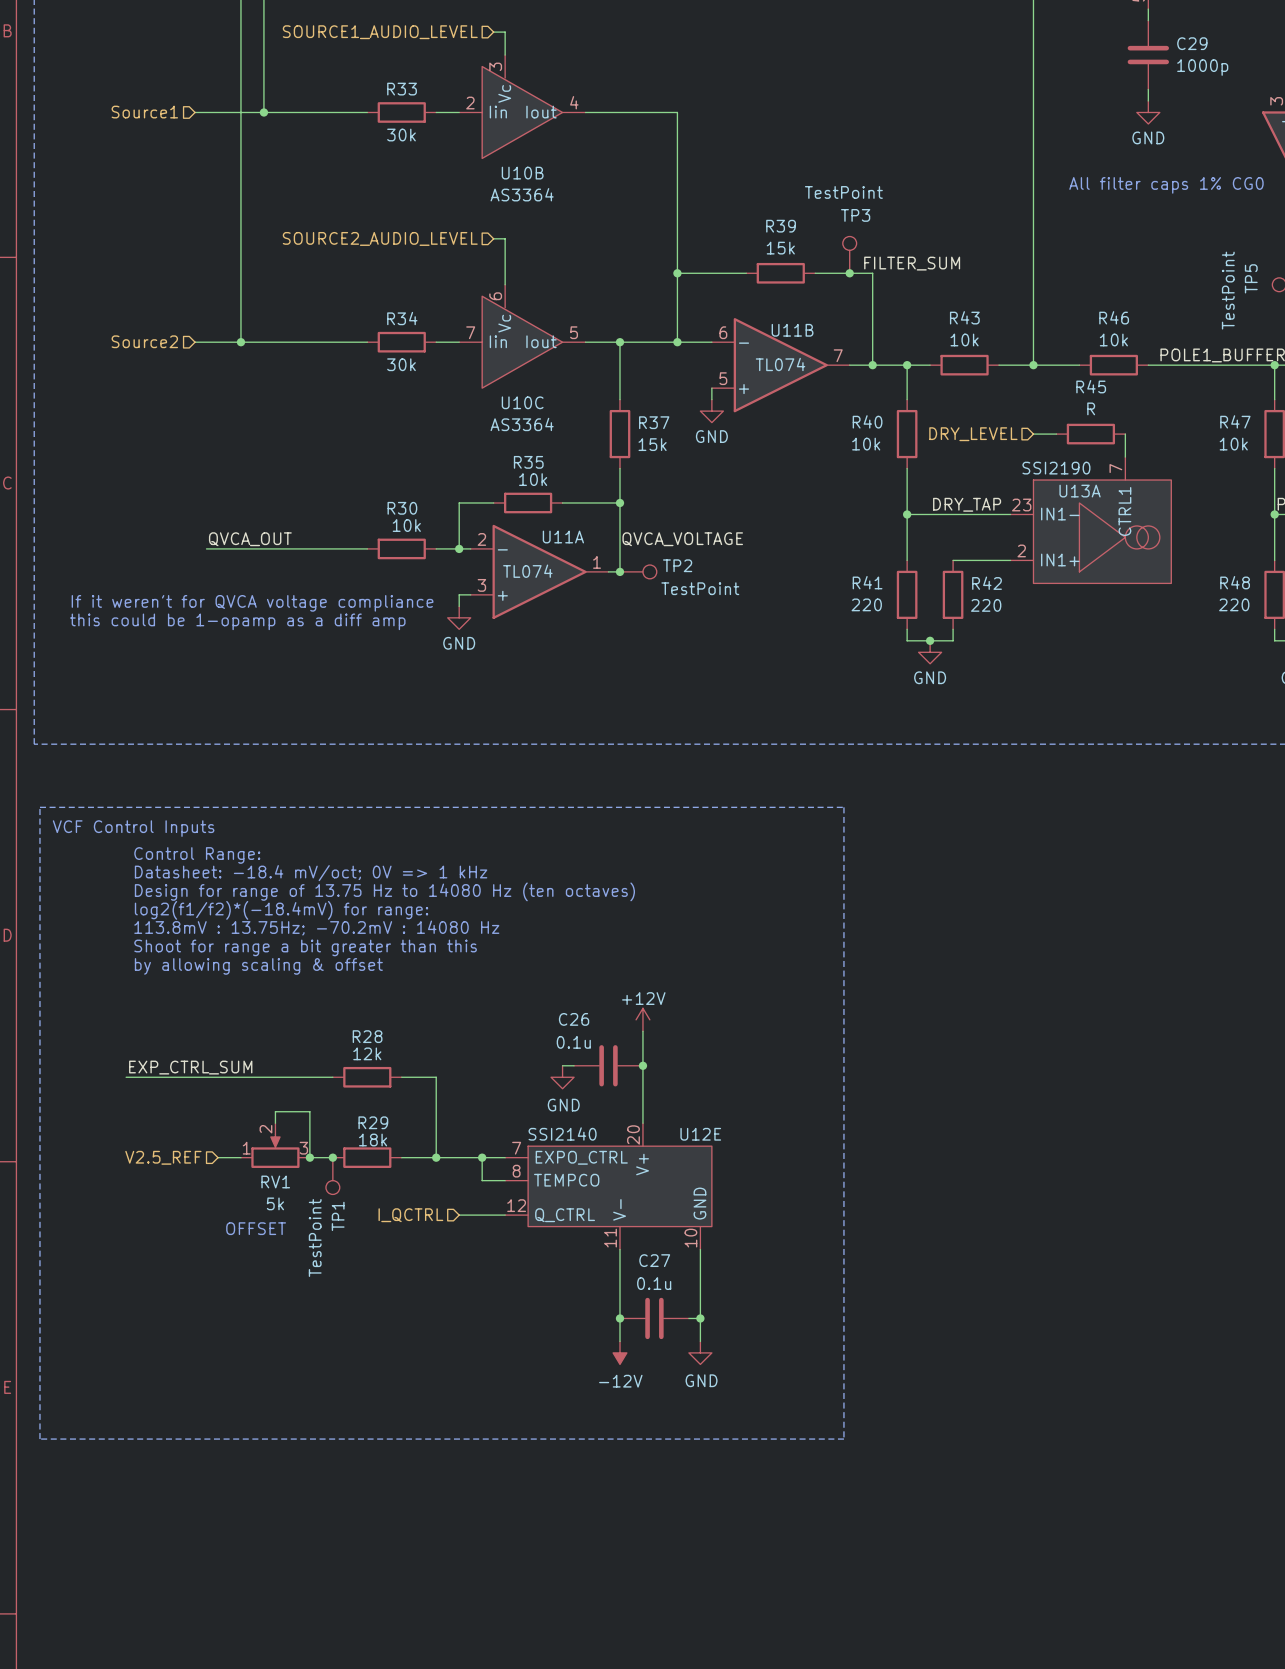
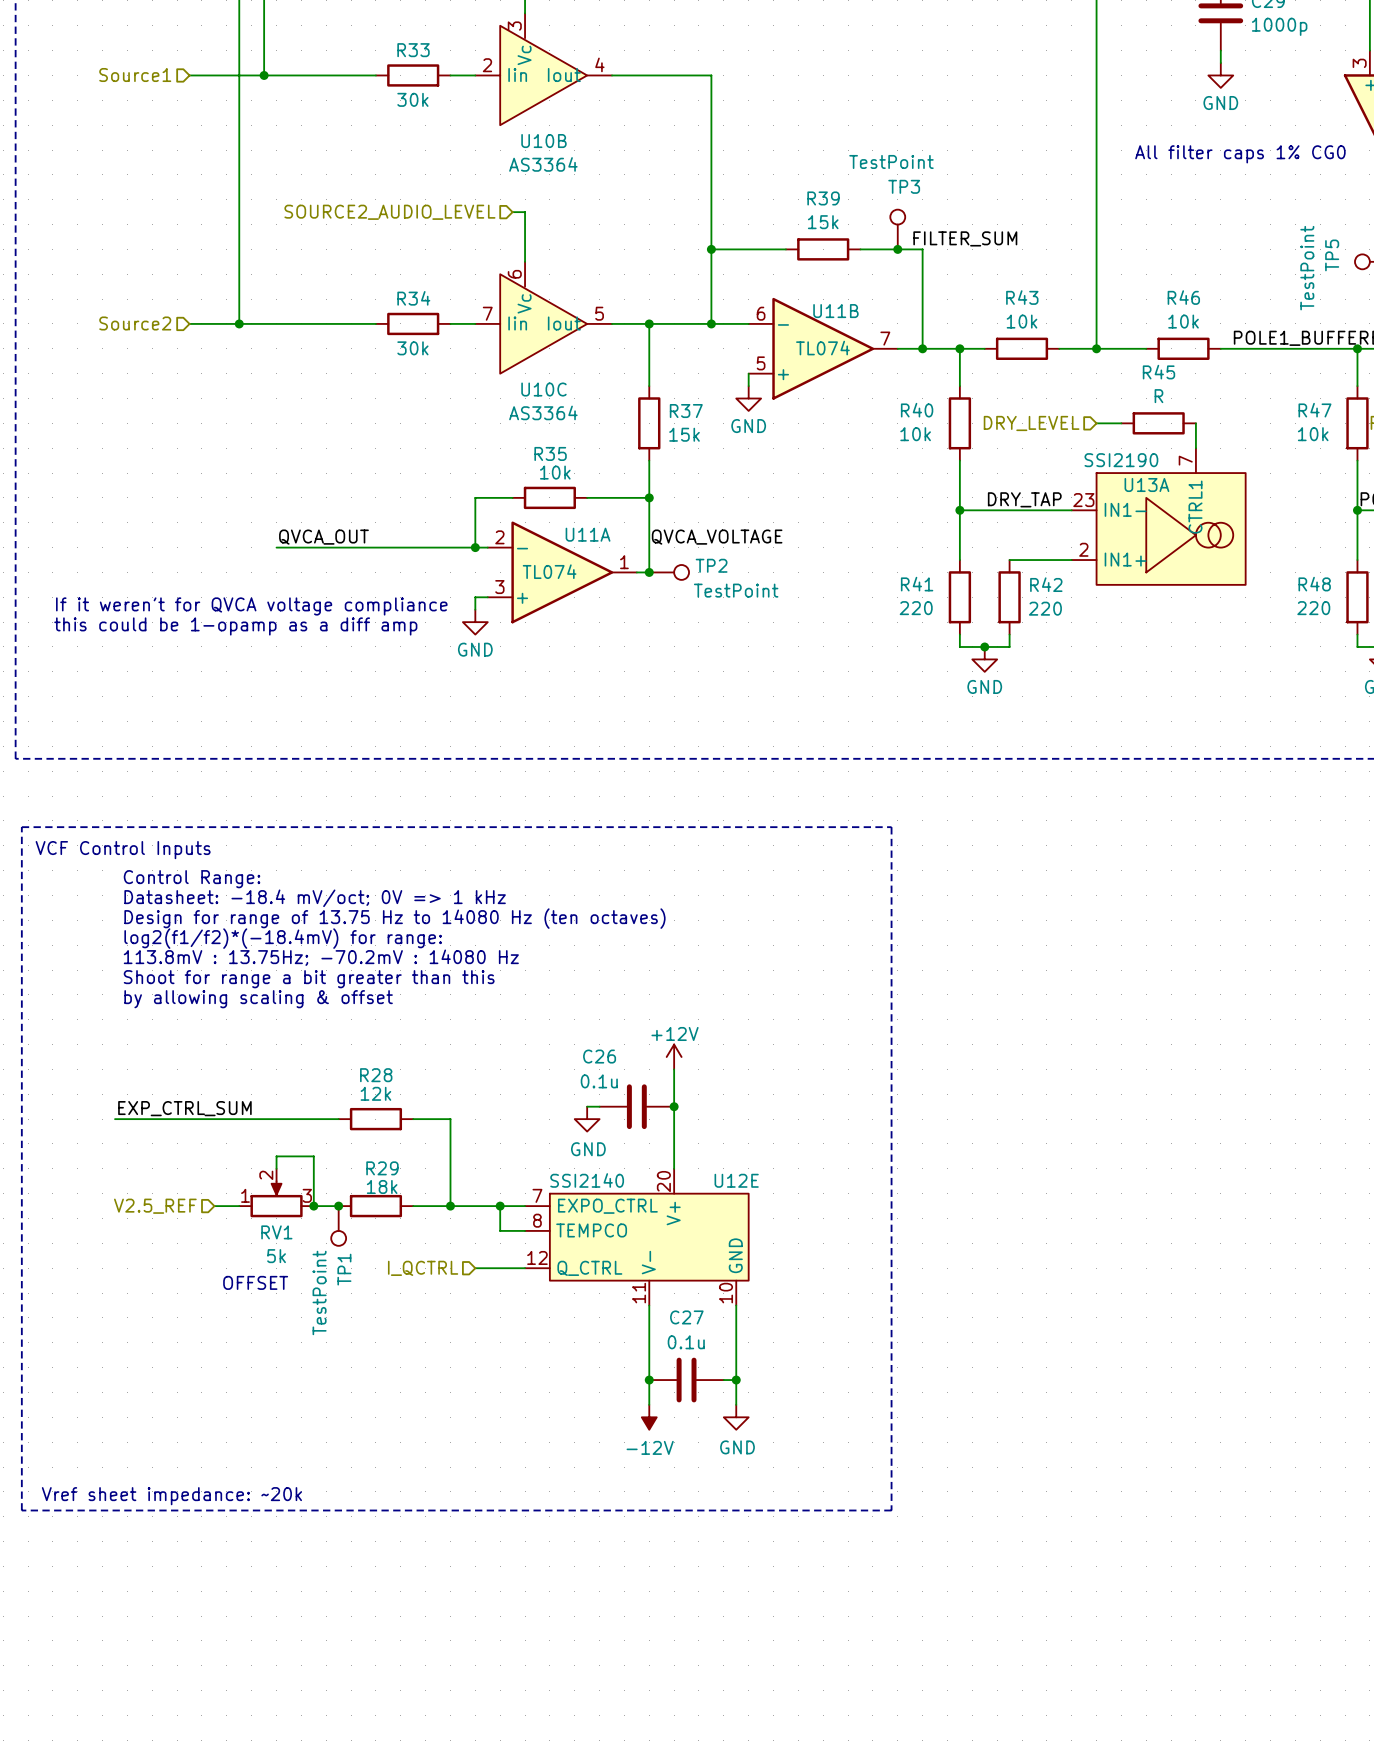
label position: QVCA_OUT (250, 539) -> QVCA_OUT (323, 537)
wire: (206, 548) (275, 548) -> (375, 547) (450, 547)
R30: 10k (401, 548) -> none
text: none -> Vref sheet impedance: ~20k (171, 1496)

